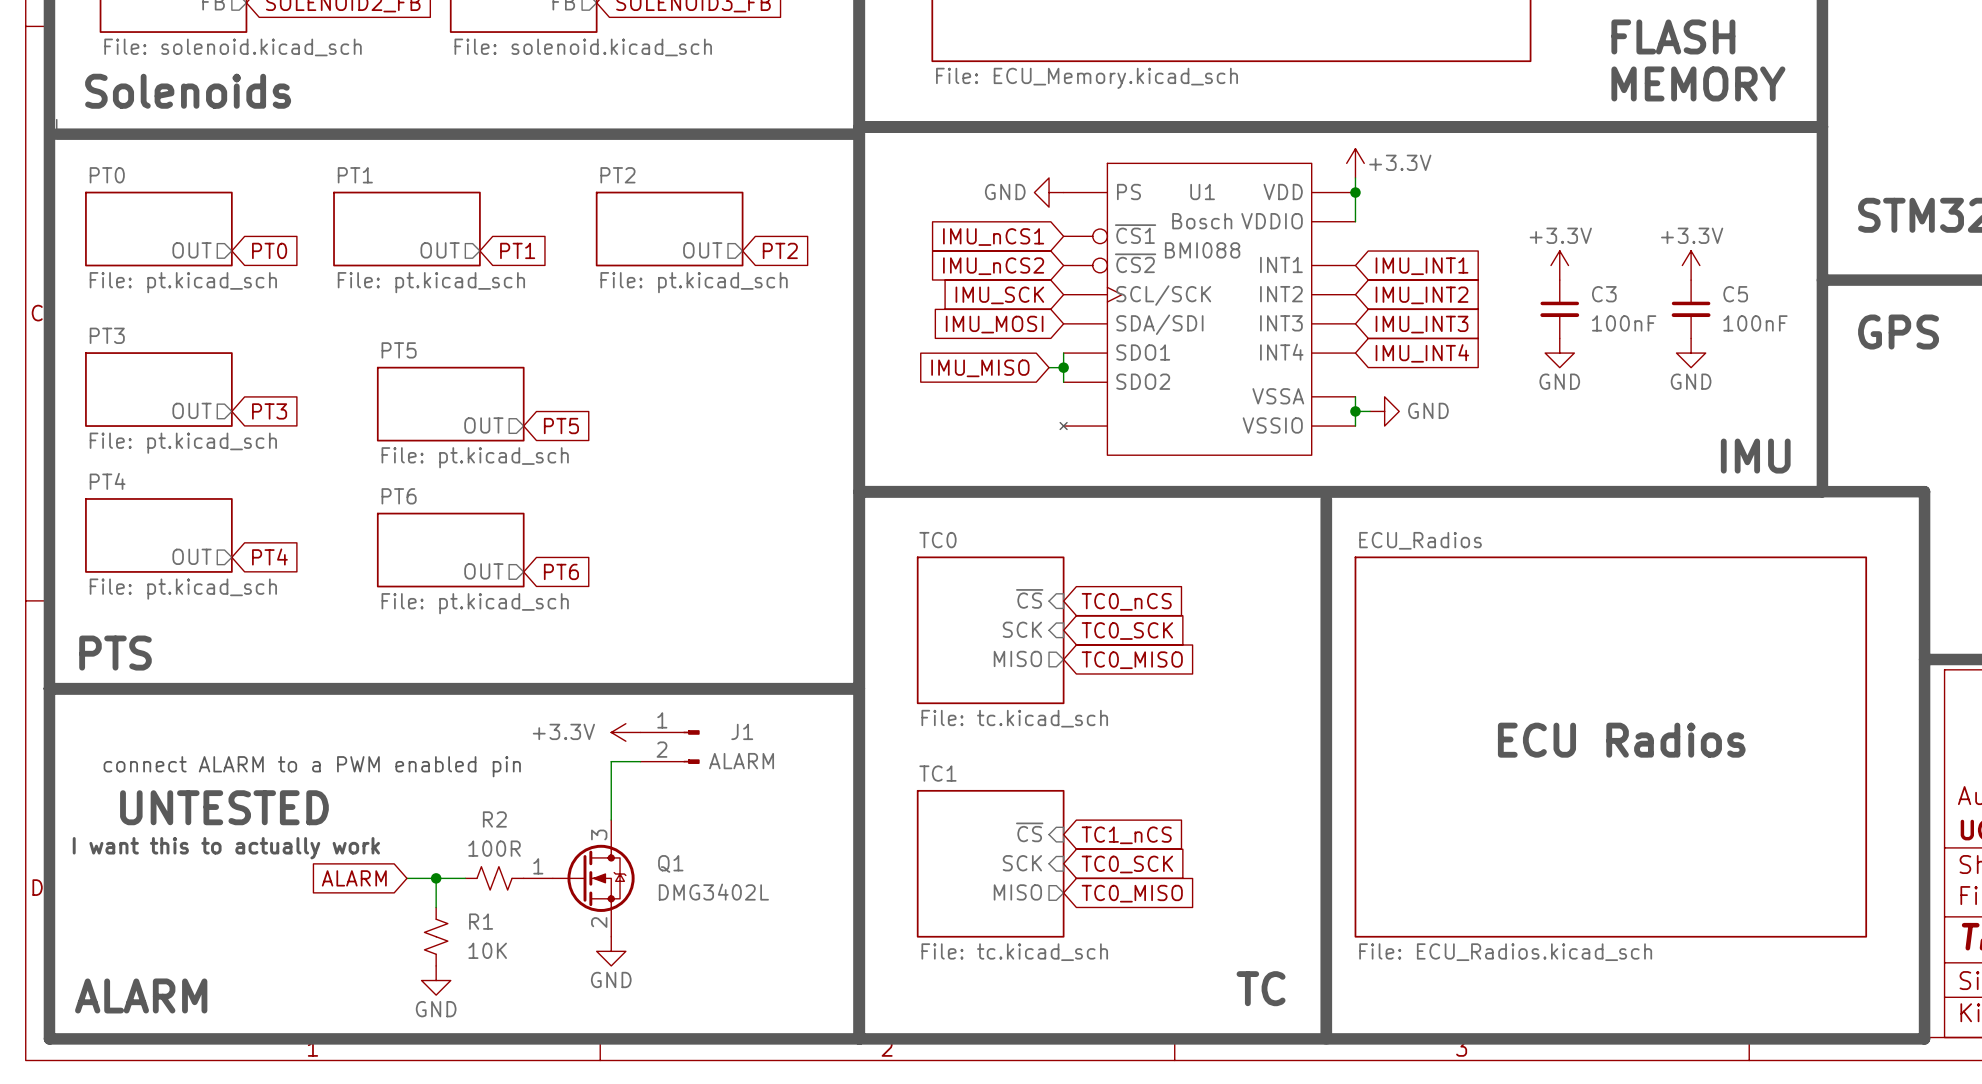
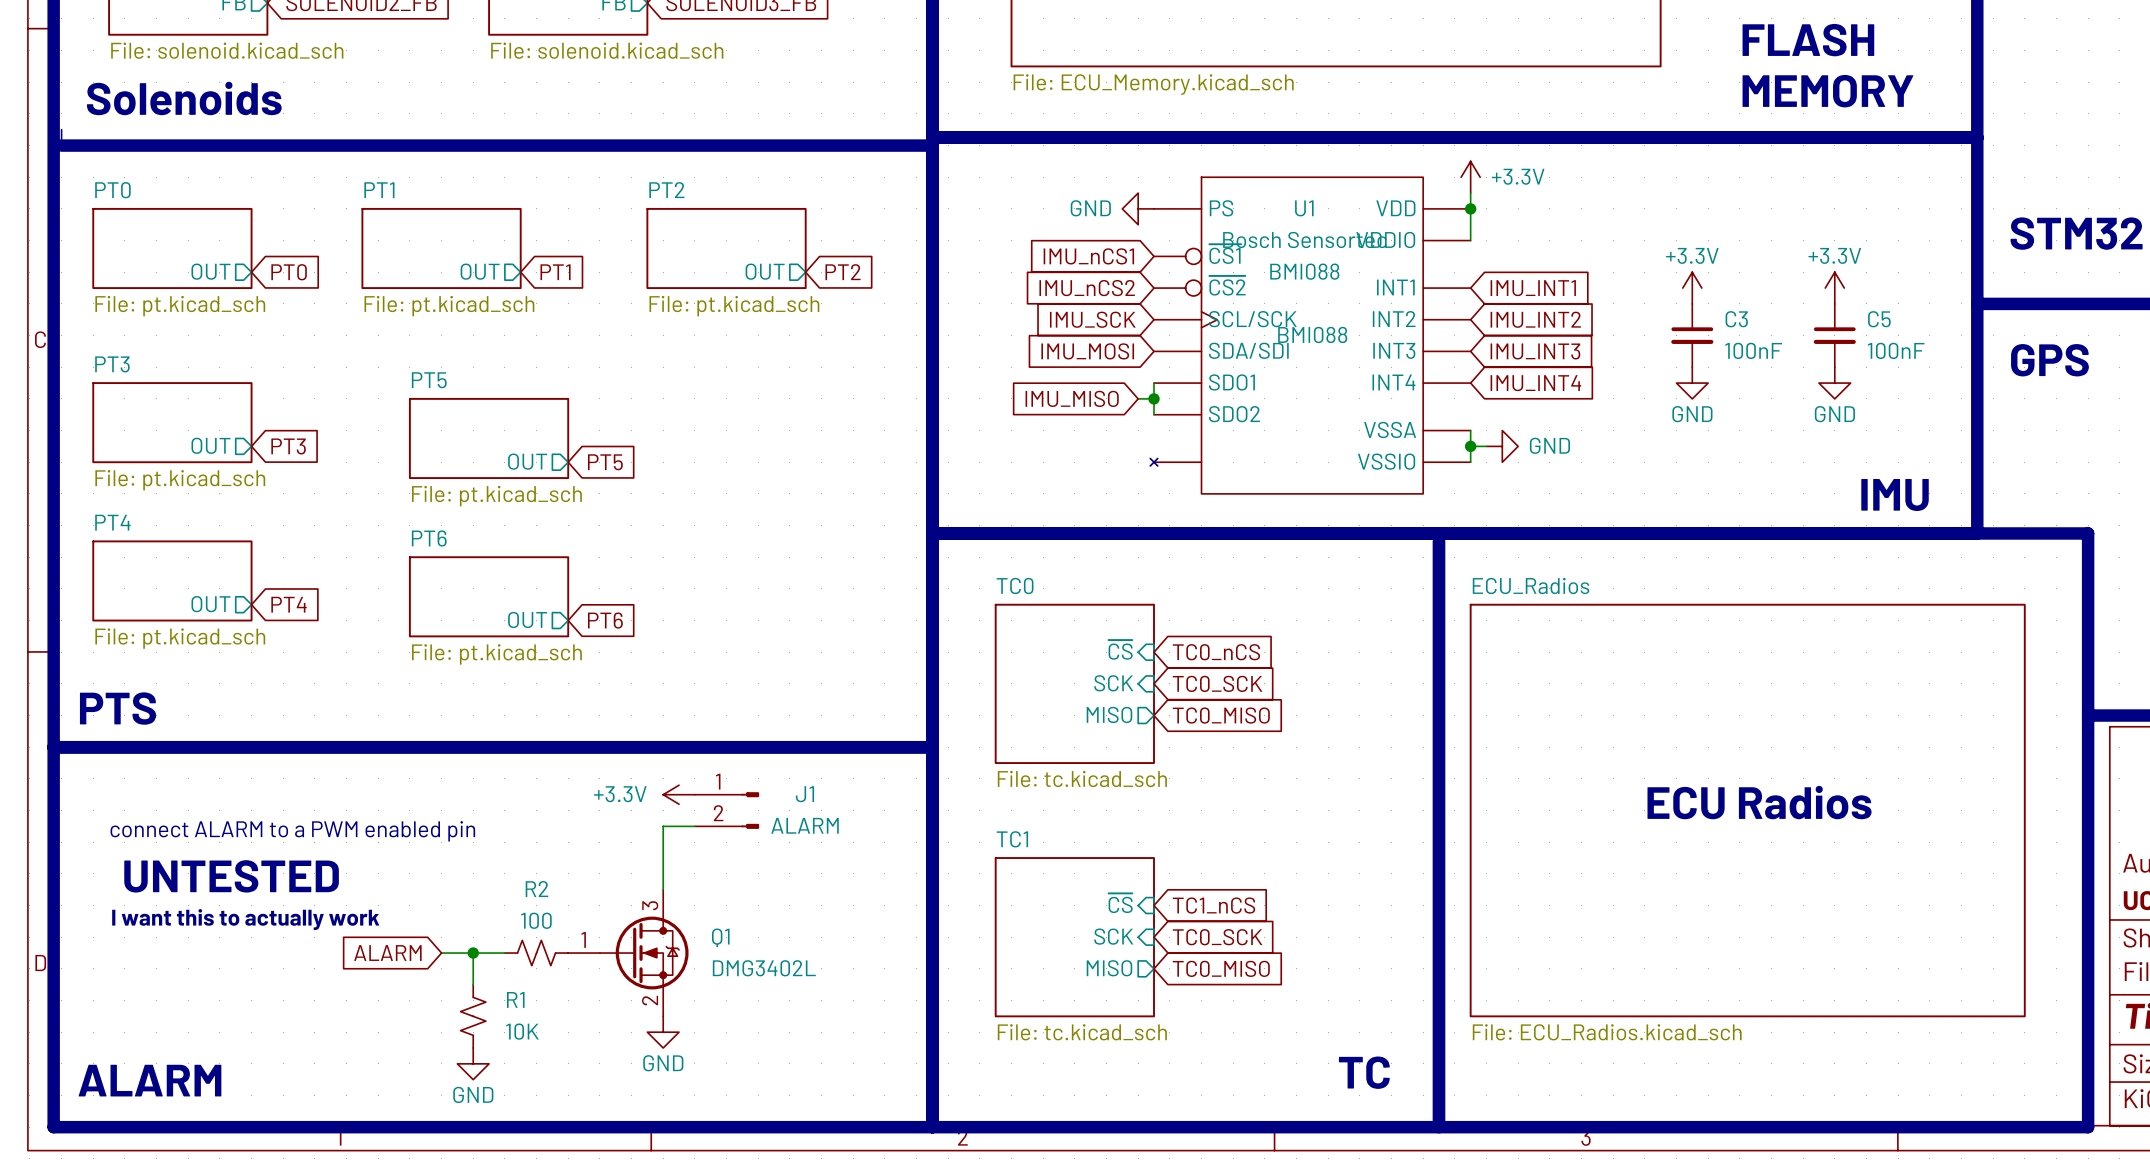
U1 text: Bosch (1202, 221) -> Bosch Sensortec (1304, 239)
U1 value: none -> BMI088 (1312, 334)
R2 value: 100R (494, 848) -> 100 (536, 920)

